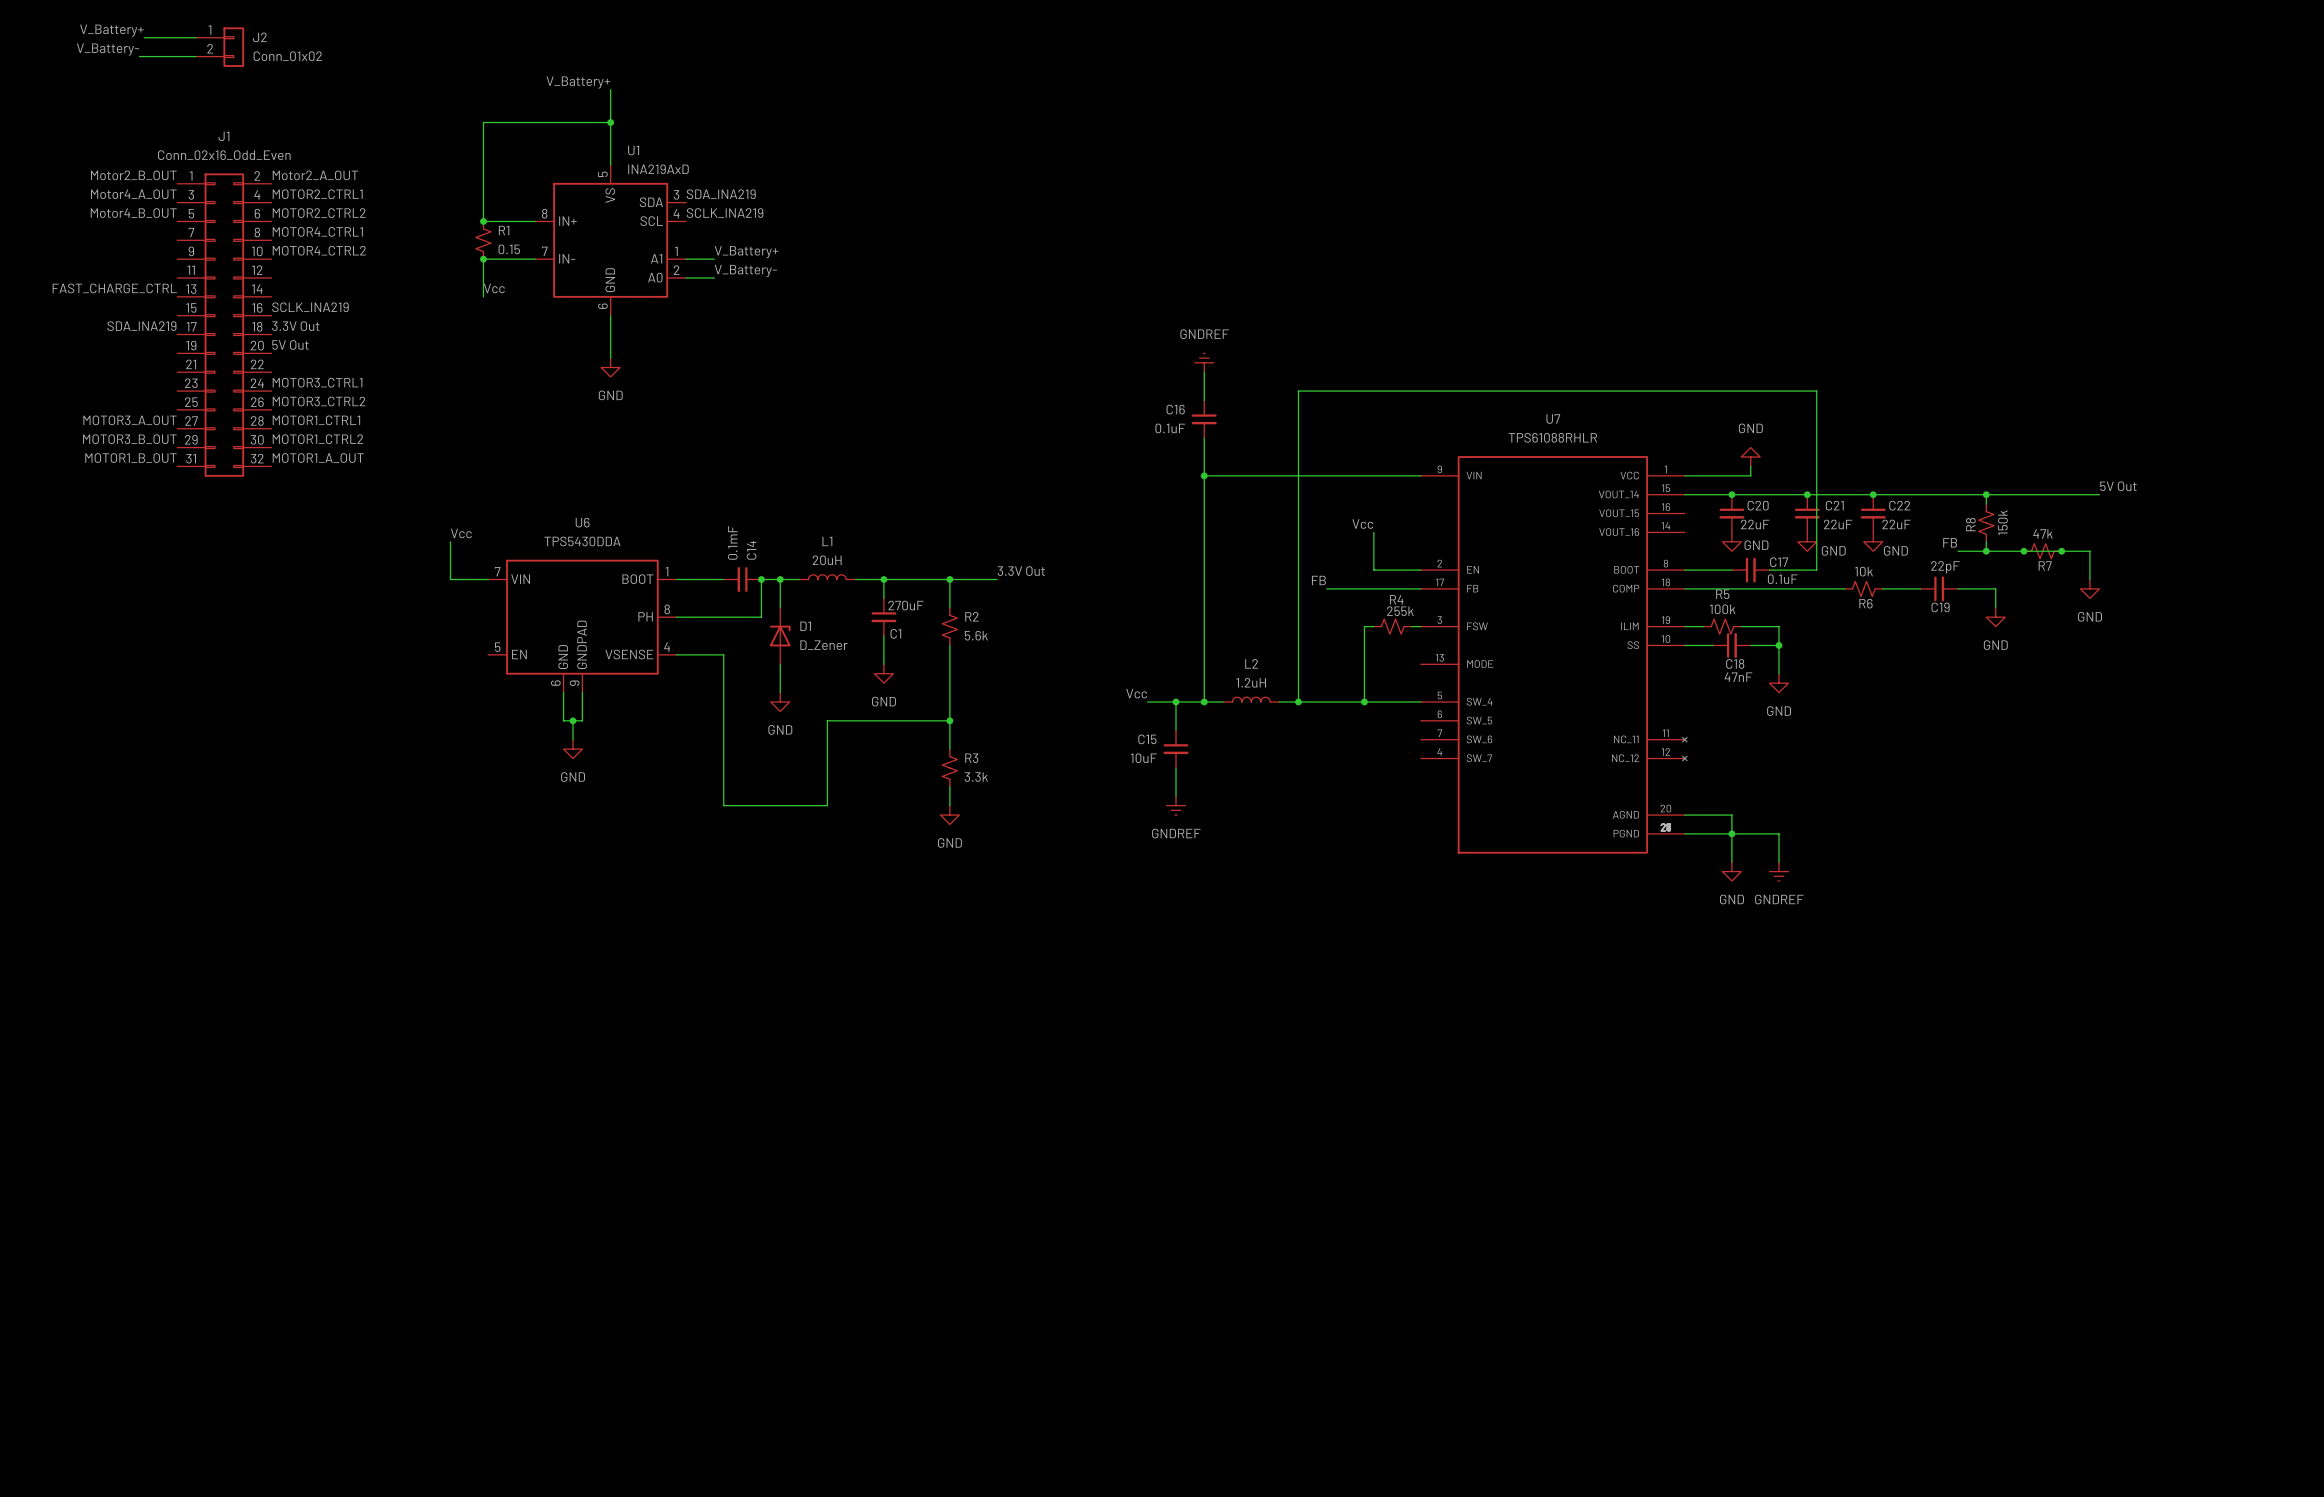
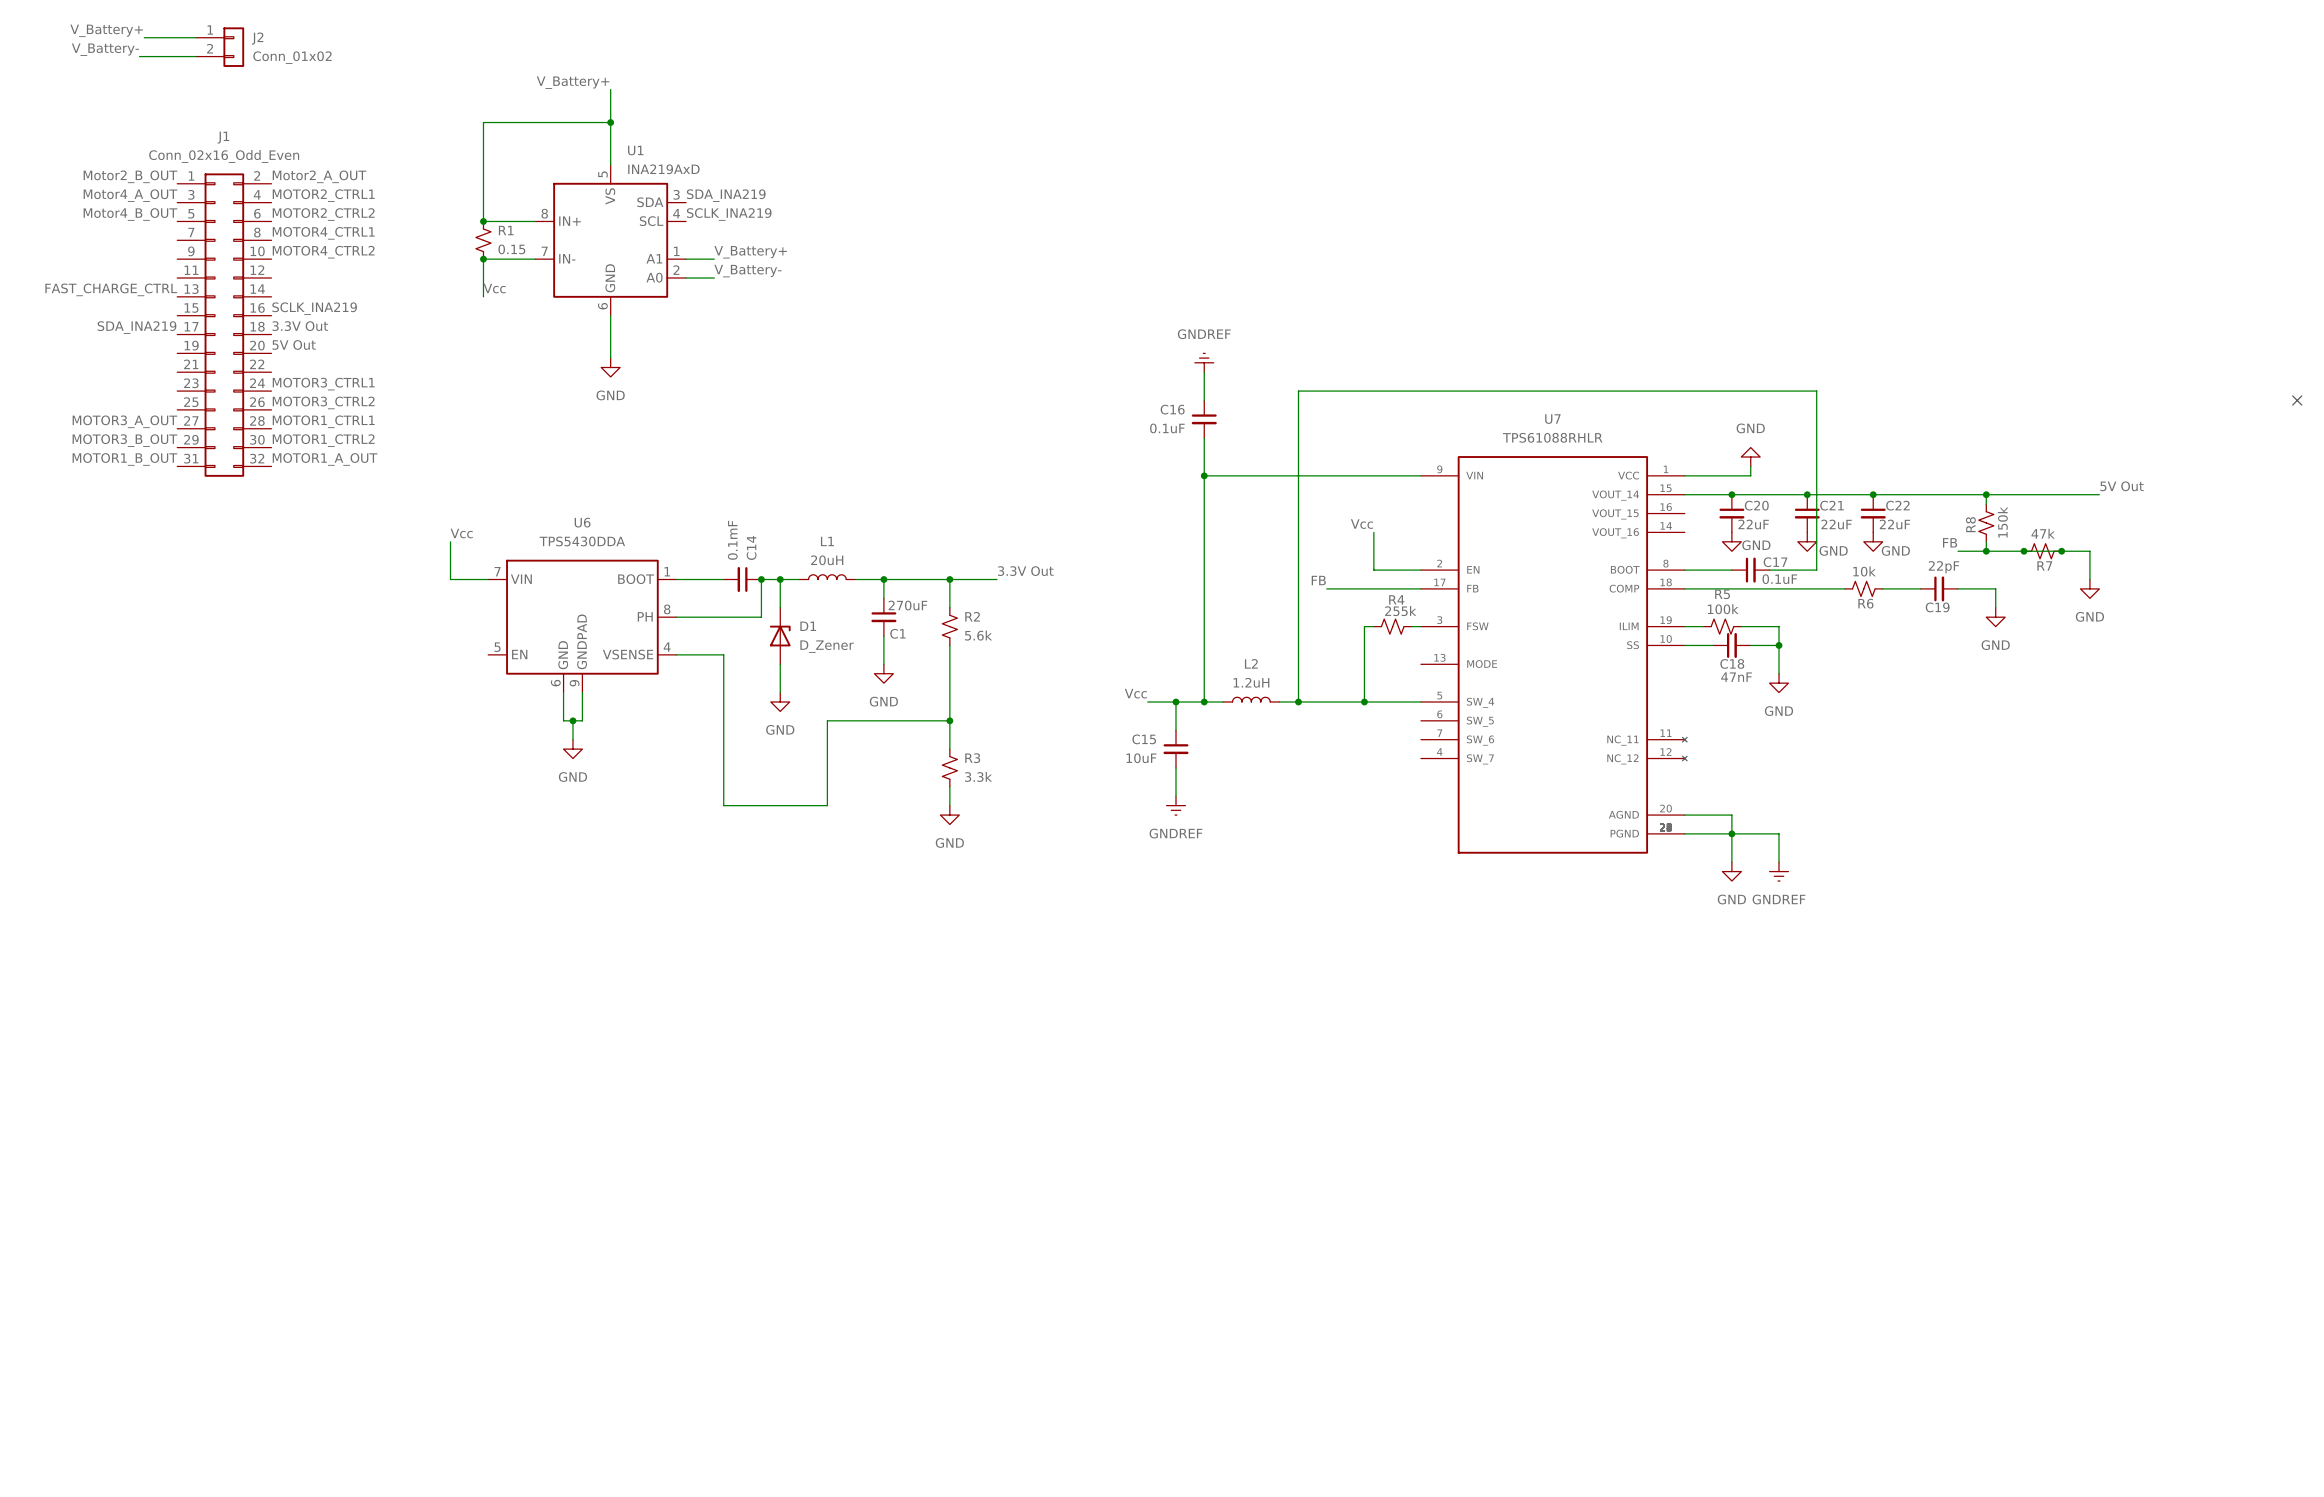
no-connect mark: none -> (2297, 400)

